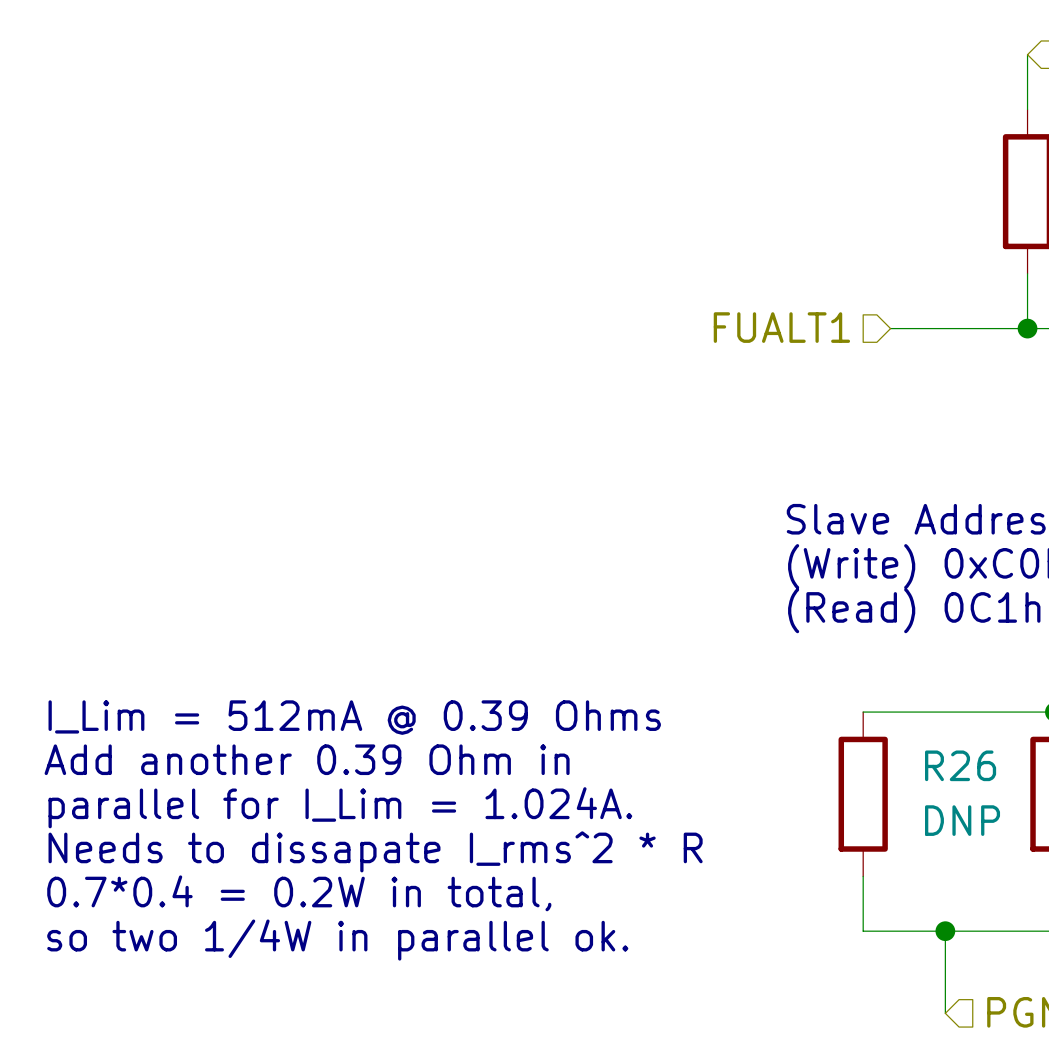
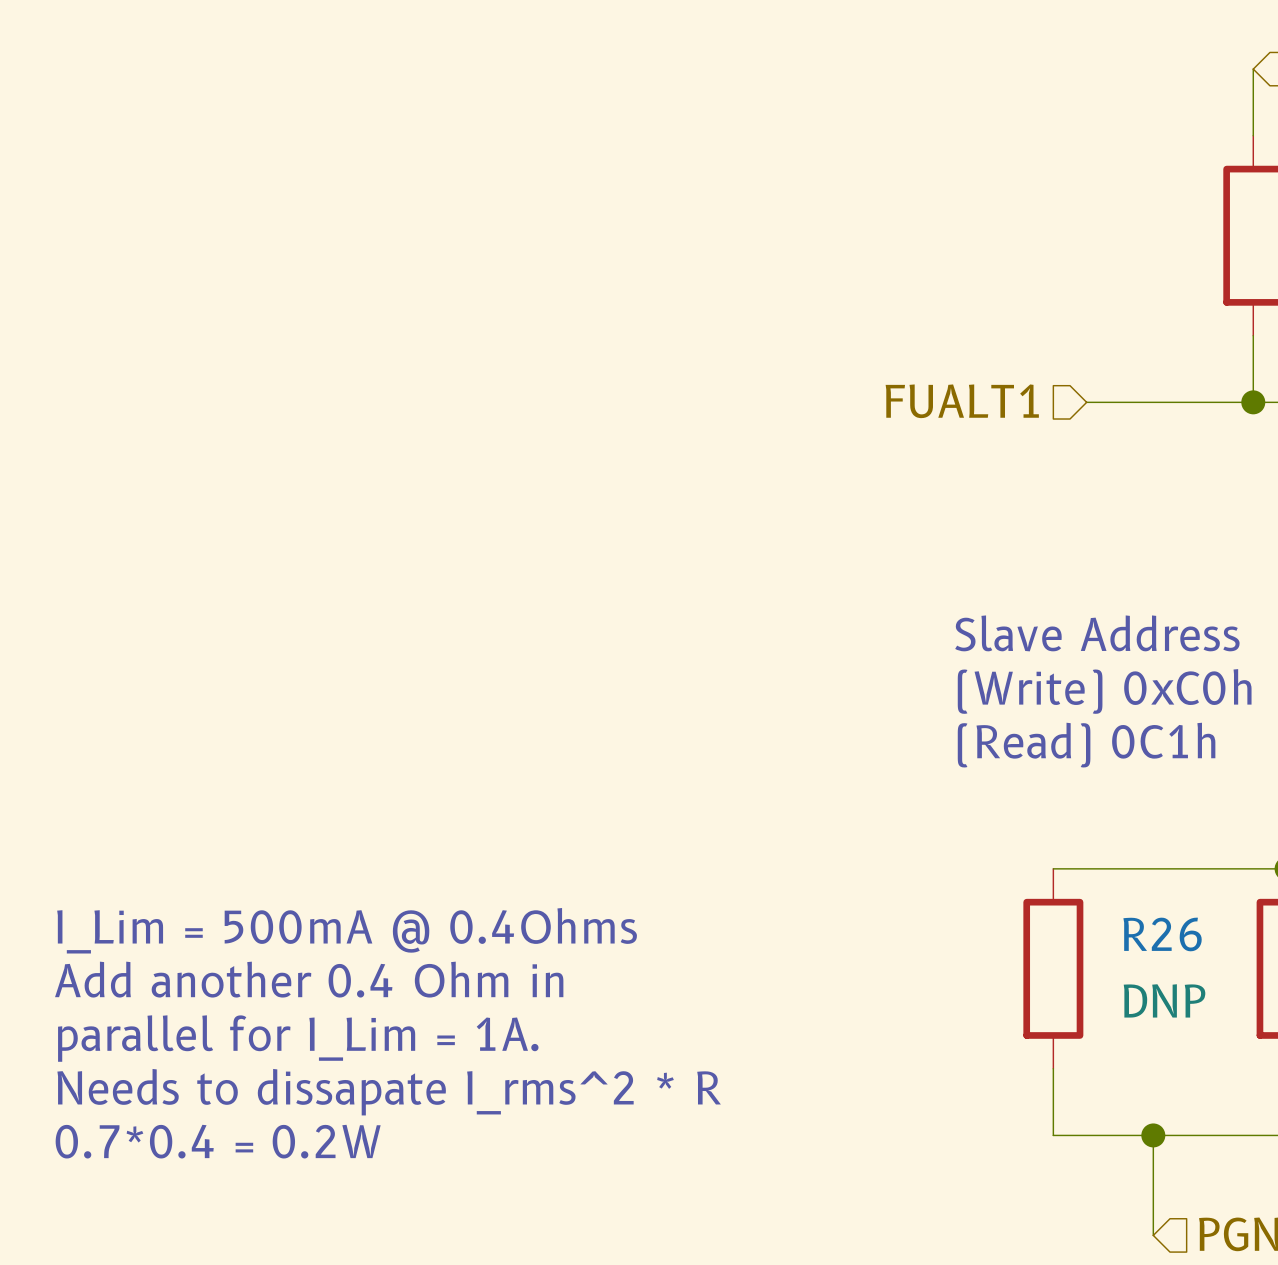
text: I_Lim = 512mA @ 0.39 Ohms (354, 717) -> none
text: Add another 0.39 Ohm in (307, 759) -> I_Lim = 500mA @ 0.4Ohms (347, 930)
text: parallel for I_Lim = 1.024A. (340, 807) -> Add another 0.4 Ohm in (309, 979)
text: Needs to dissapate I_rms^2 * R (375, 851) -> parallel for I_Lim = 1A. (298, 1038)
text: 0.7*0.4 = 0.2W in total, (299, 893) -> Needs to dissapate I_rms^2 * R (389, 1092)
text: so two 1/4W in parallel ok. (337, 940) -> 0.7*0.4 = 0.2W (218, 1141)

